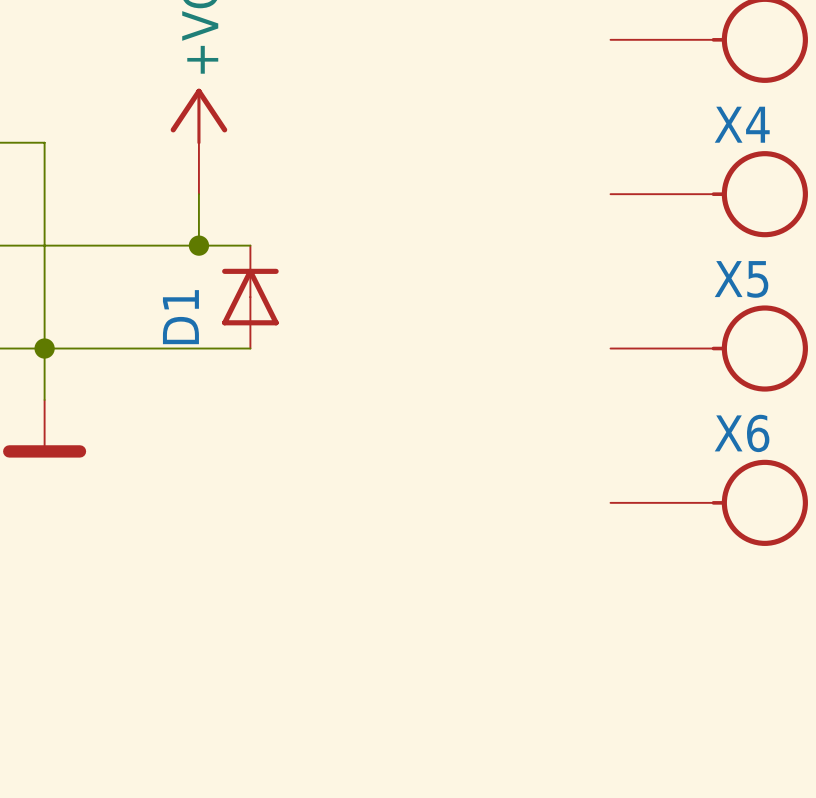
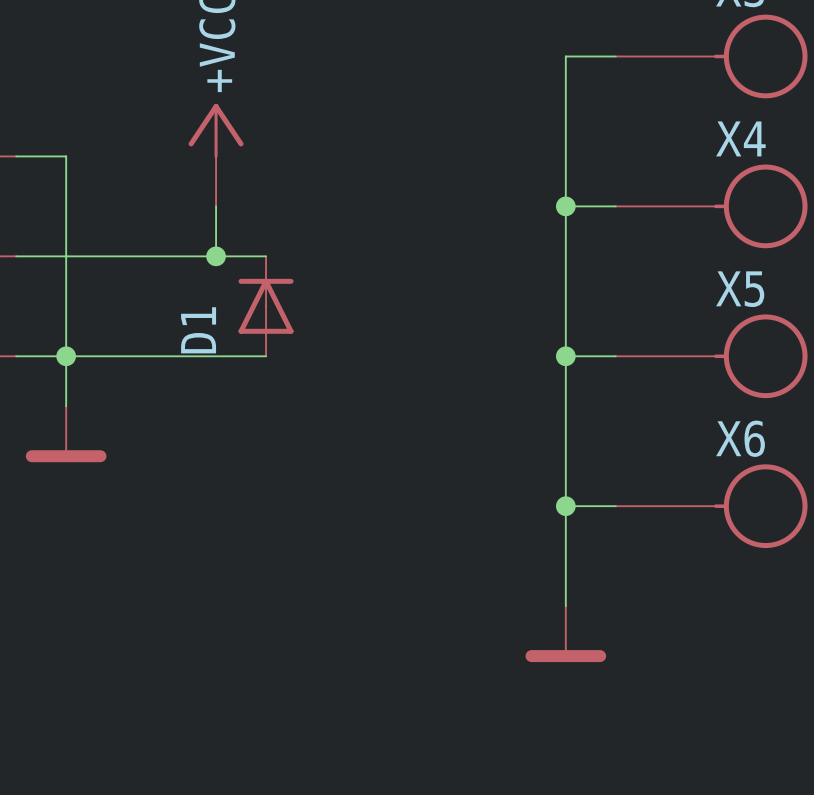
wire: none -> (615, 56) (565, 56) (565, 606)
wire: none -> (565, 206) (615, 206)
junction: none -> (565, 206)
wire: none -> (565, 356) (615, 356)
junction: none -> (565, 356)
wire: none -> (565, 506) (615, 506)
junction: none -> (565, 506)
power symbol: none -> (565, 634)

